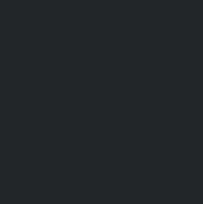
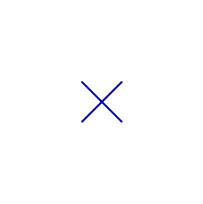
no-connect mark: none -> (101, 101)

